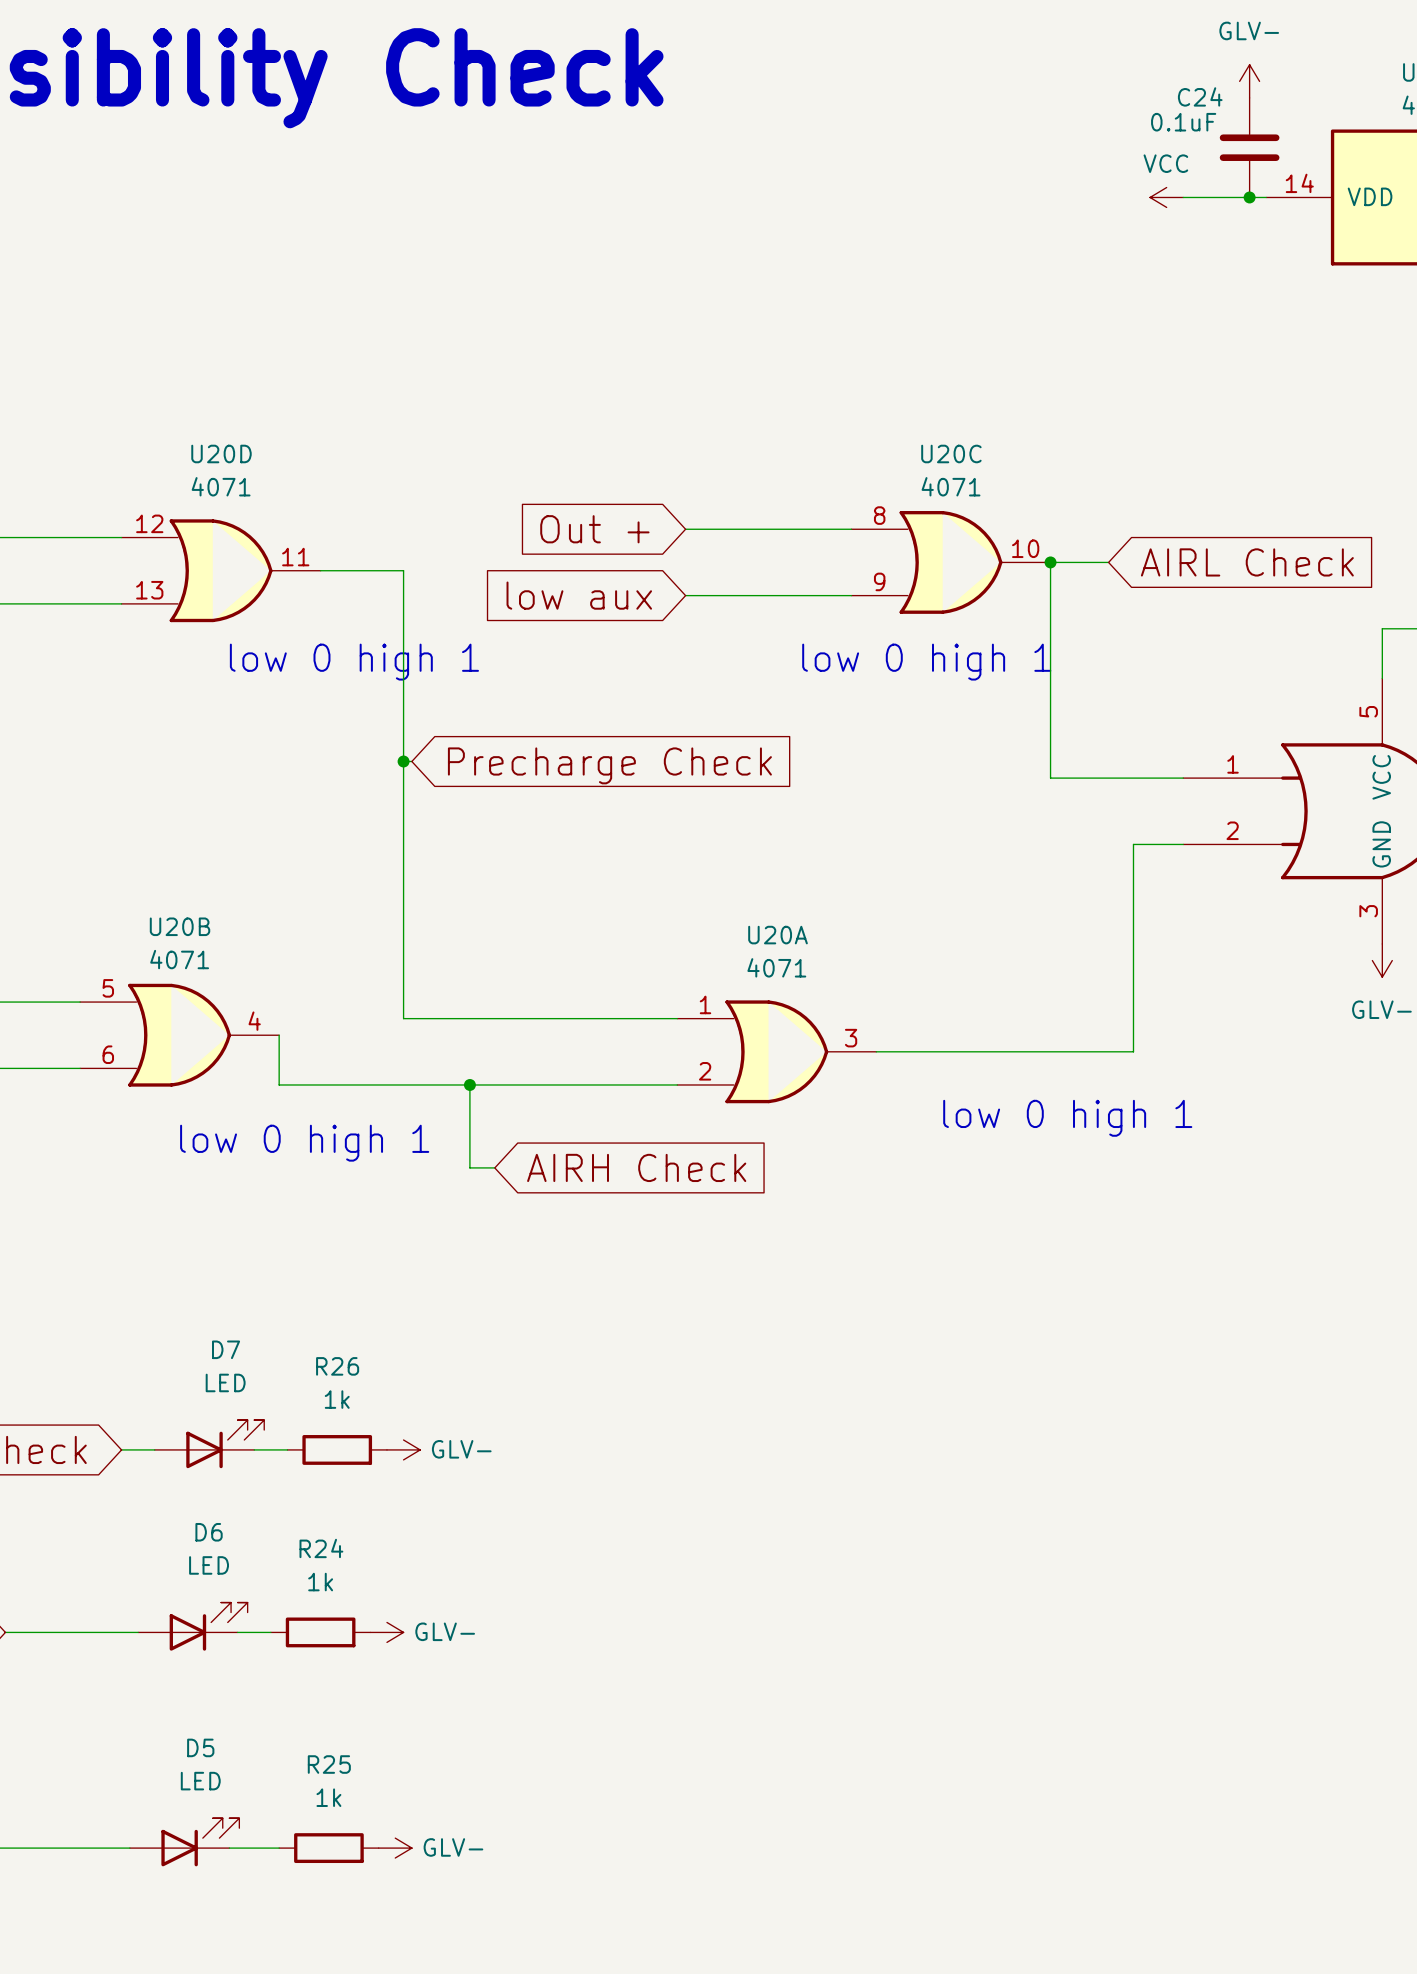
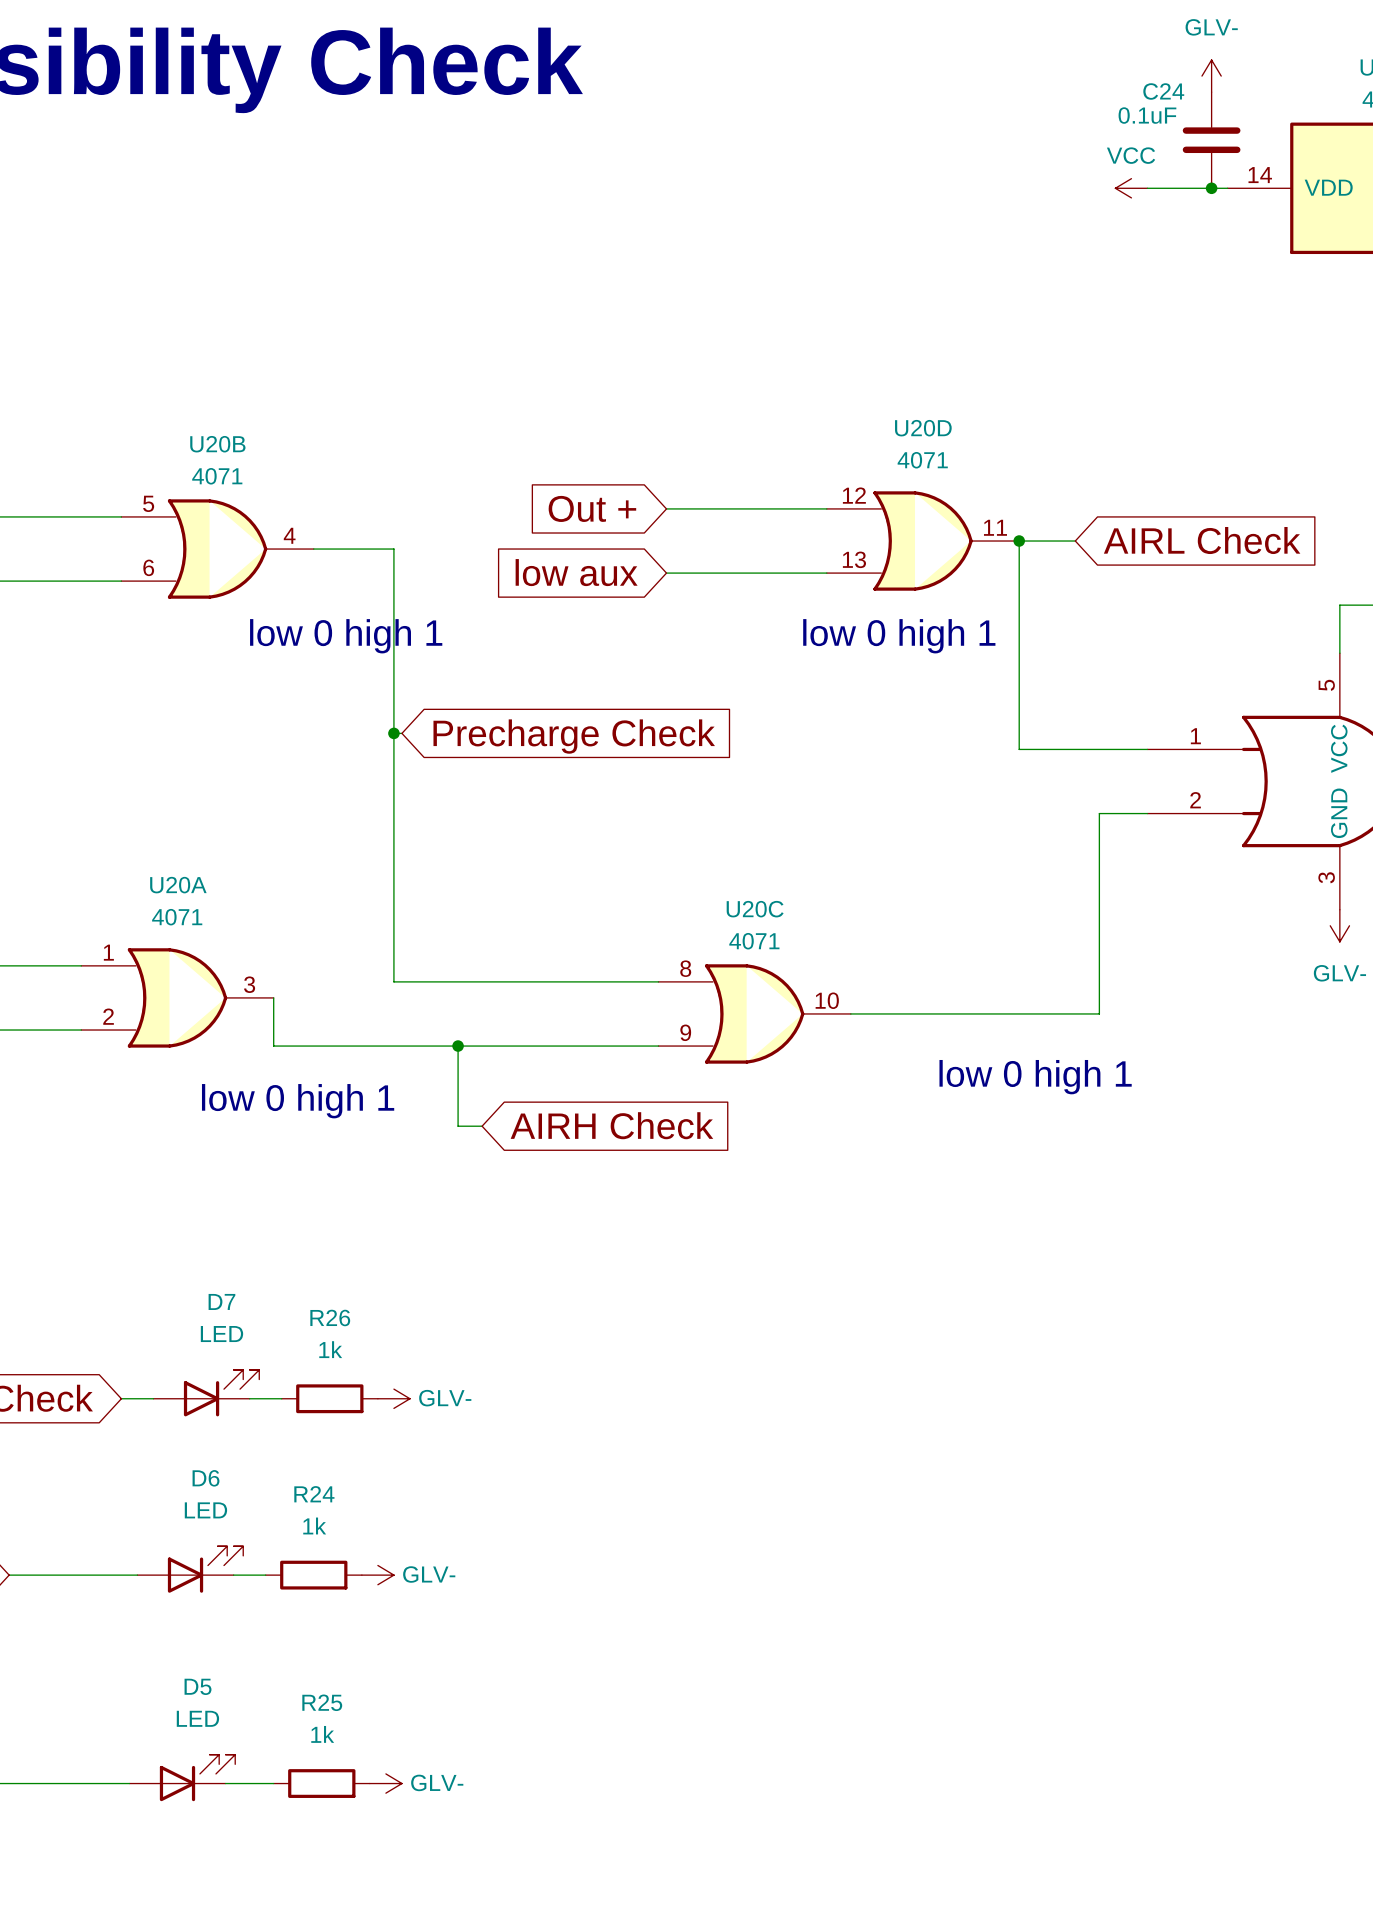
U20C position: (951, 562) -> (754, 1013)
U20D position: (221, 570) -> (923, 541)
U20B position: (179, 1035) -> (217, 549)
U20A position: (776, 1051) -> (177, 997)

